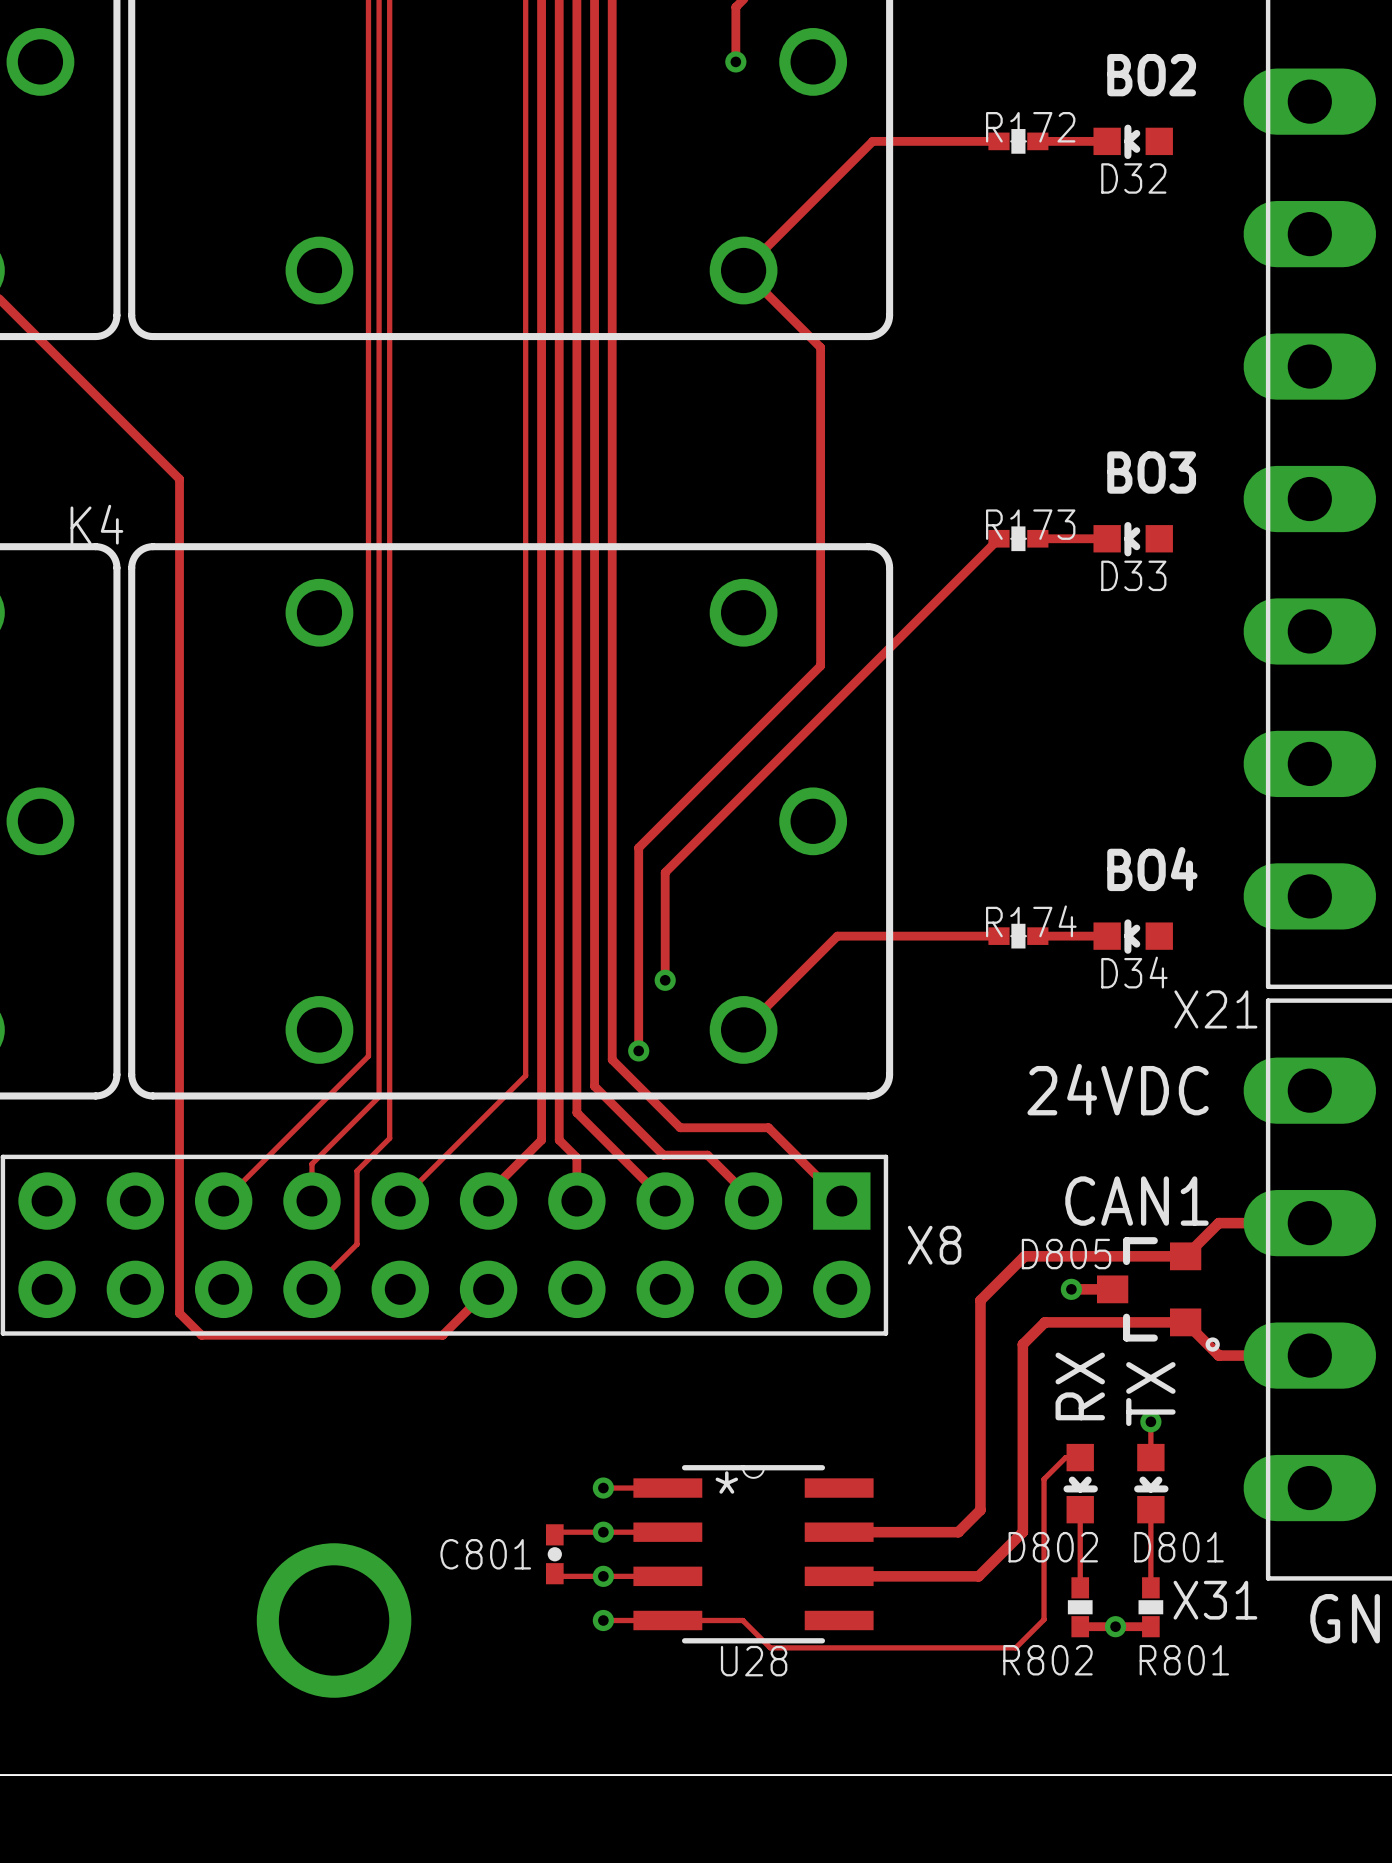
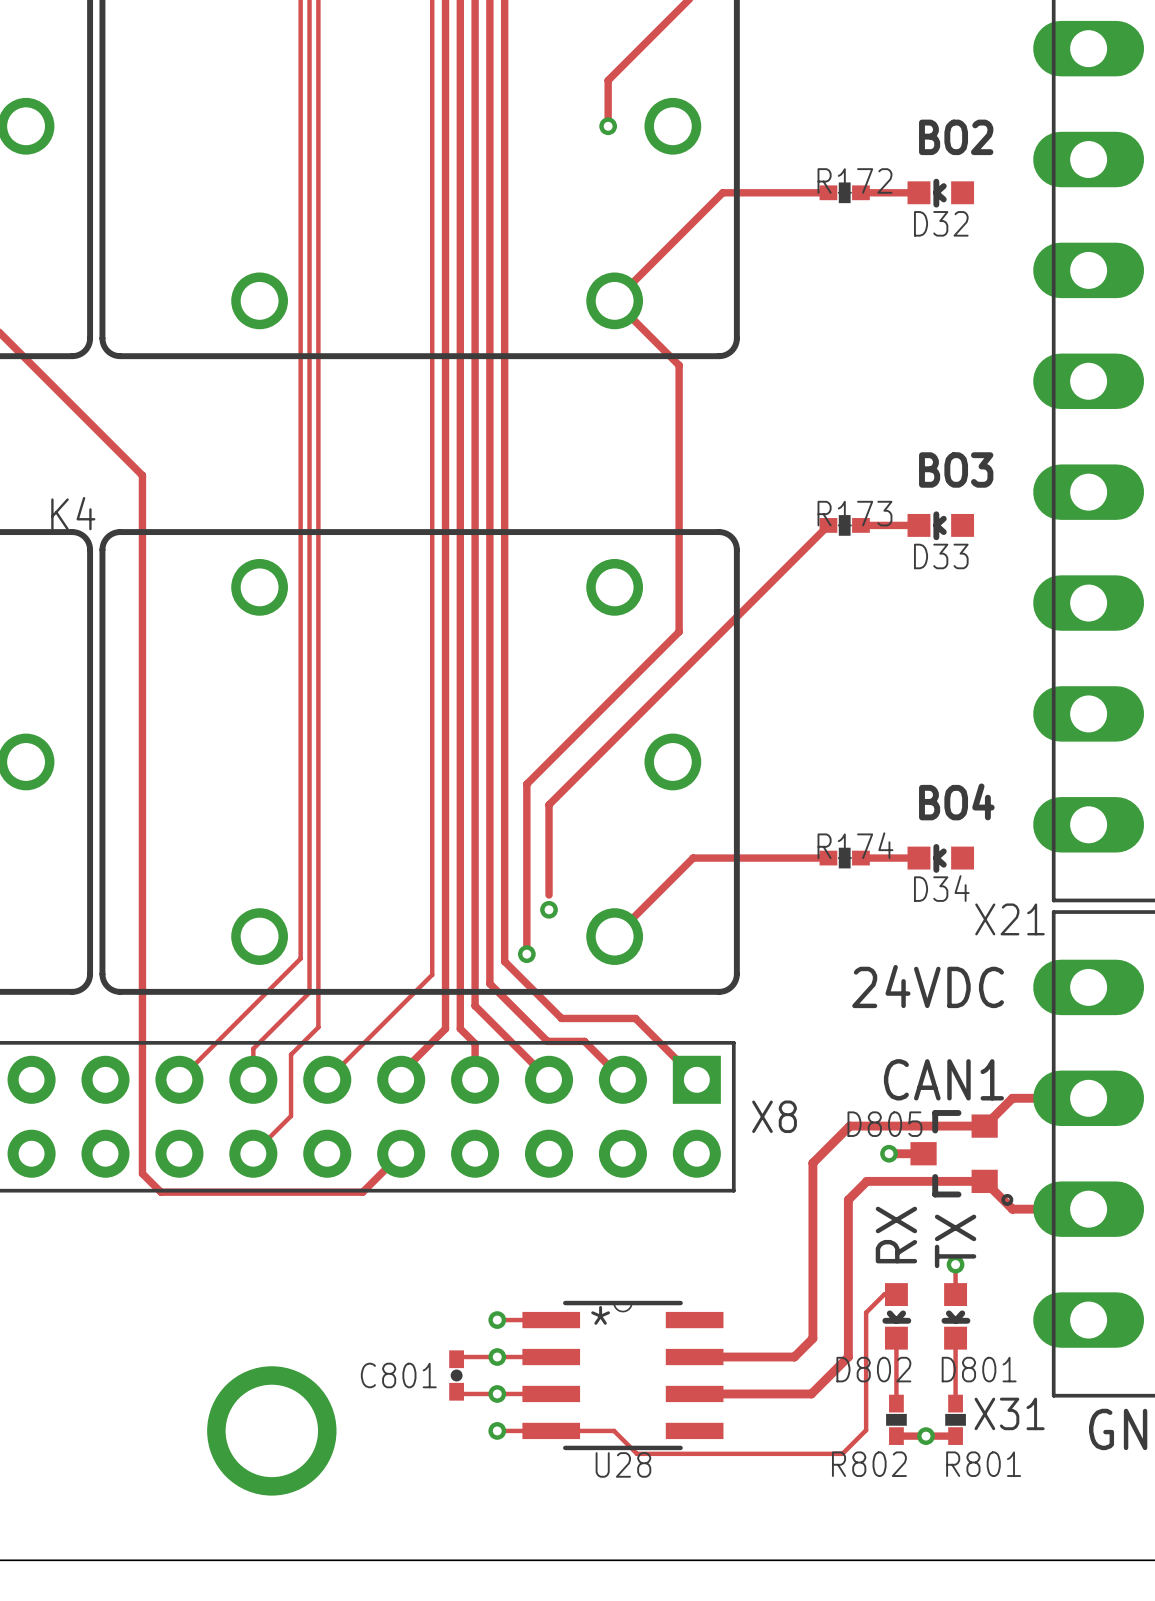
via position: (665, 980) -> (549, 909)

